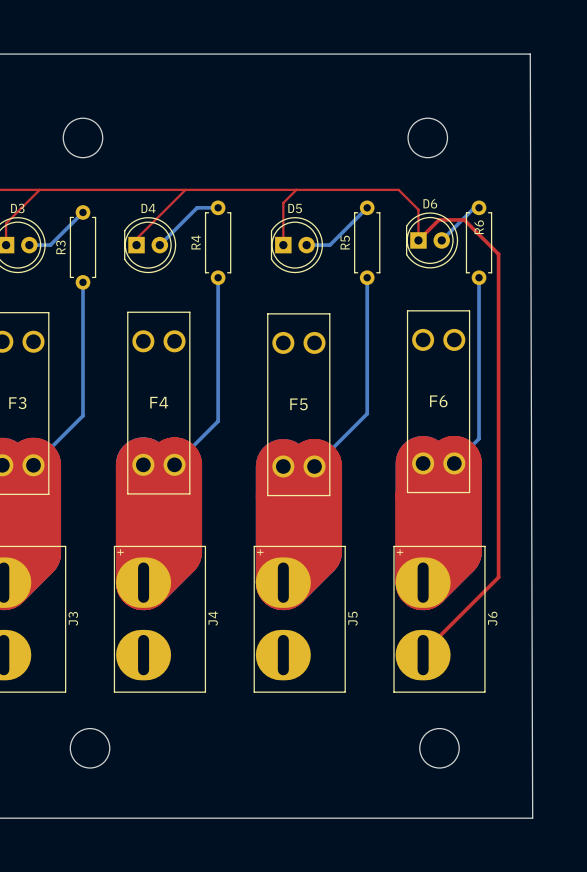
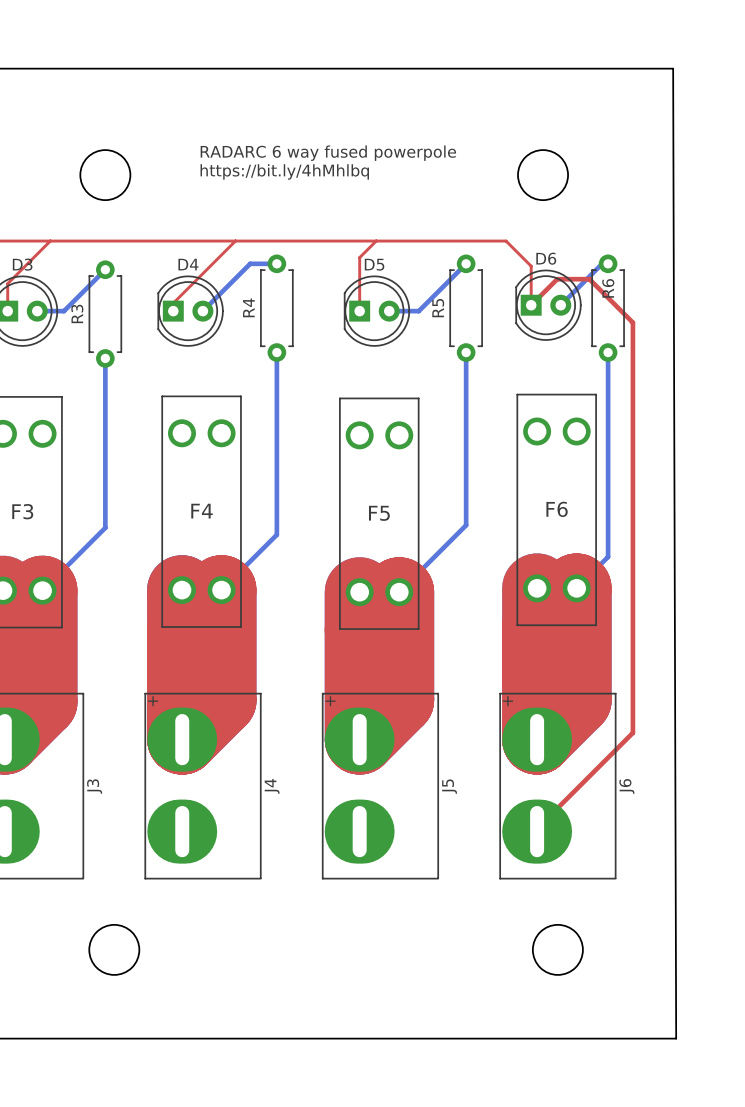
text: none -> RADARC 6 way fused powerpole (328, 153)
text: none -> https://bit.ly/4hMhlbq (284, 171)

